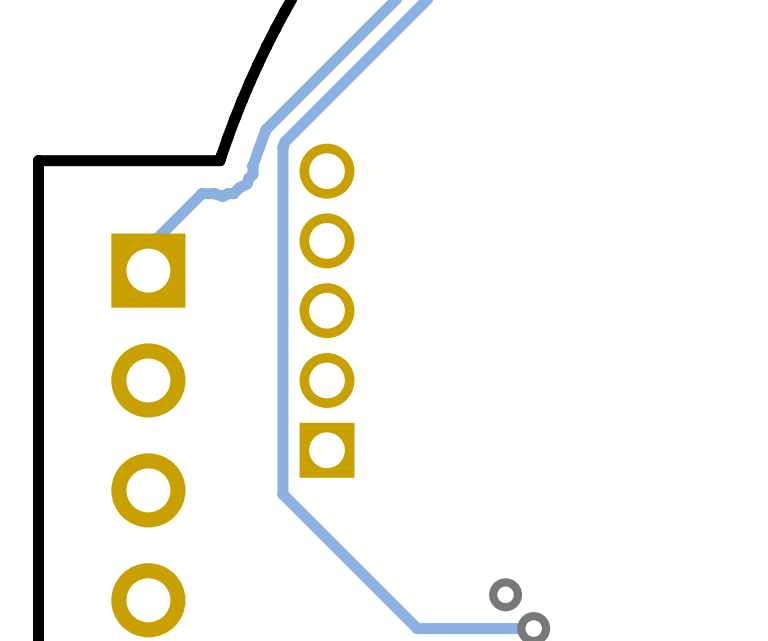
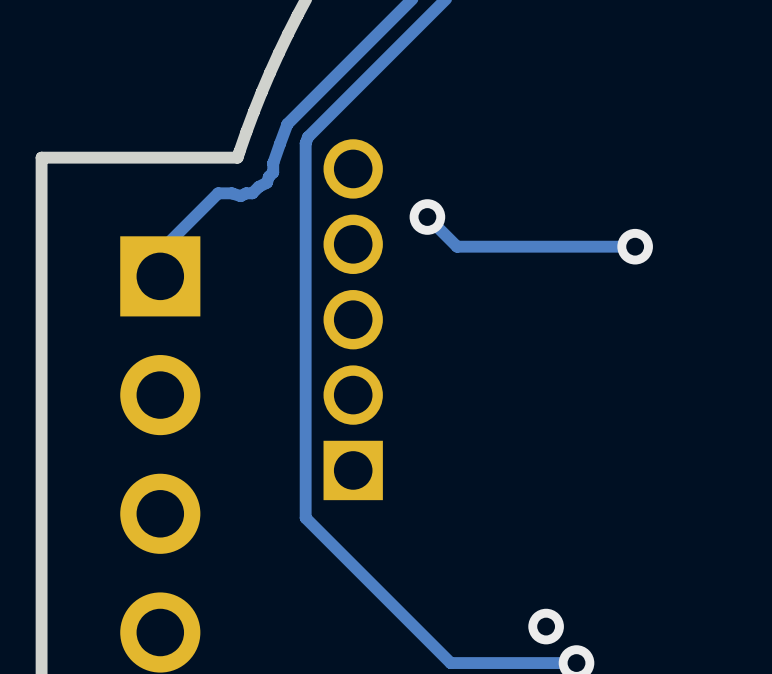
track: none -> (427, 217) (457, 246) (635, 246)
via: none -> (427, 217)
via: none -> (635, 246)

